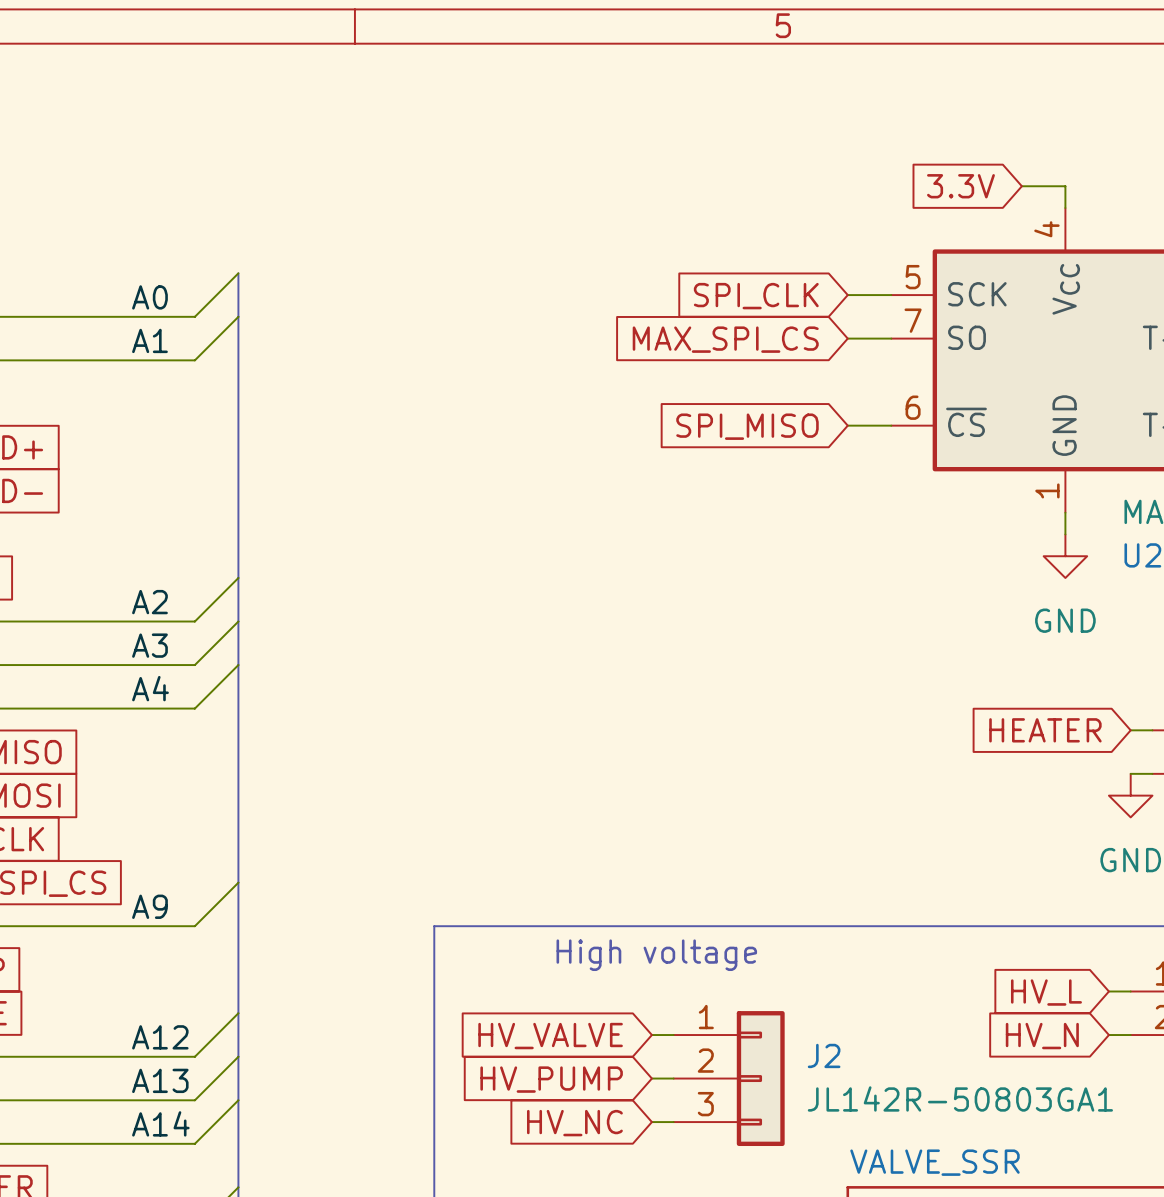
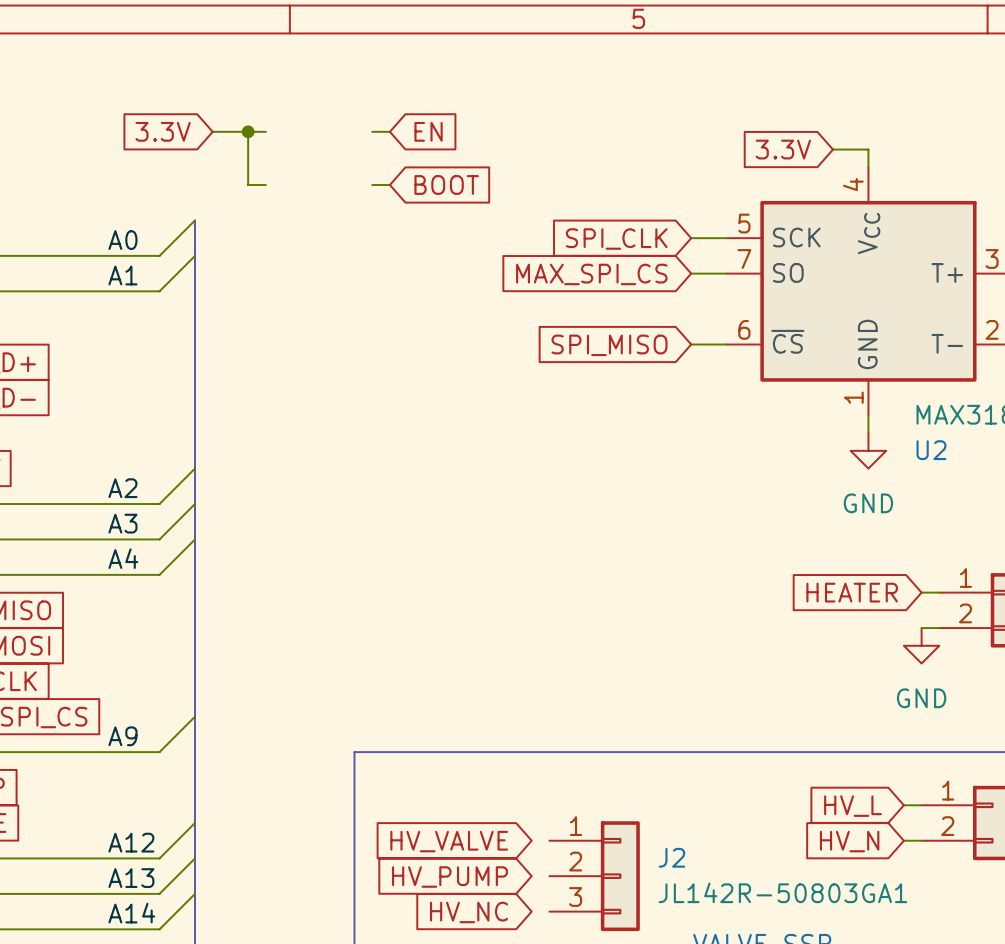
global label: none -> 3.3V (163, 131)
wire: none -> (212, 131) (265, 131)
wire: none -> (248, 131) (248, 185) (265, 185)
junction: none -> (248, 131)
wire: none -> (372, 131) (389, 131)
global label: none -> EN (428, 131)
wire: none -> (372, 185) (389, 185)
global label: none -> BOOT (446, 185)
text: High voltage (656, 955) -> none
wire: (651, 1035) (673, 1035) -> none
wire: (651, 1078) (673, 1078) -> none
wire: (651, 1122) (673, 1122) -> none

